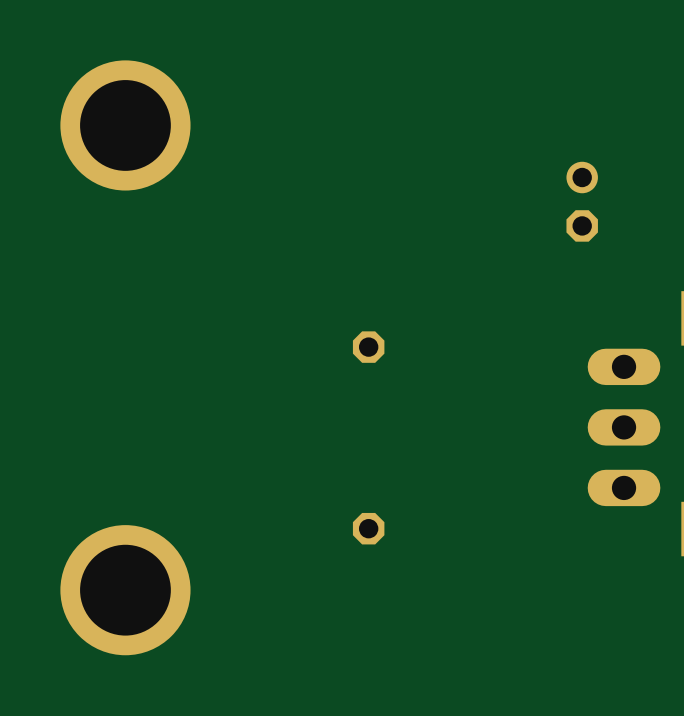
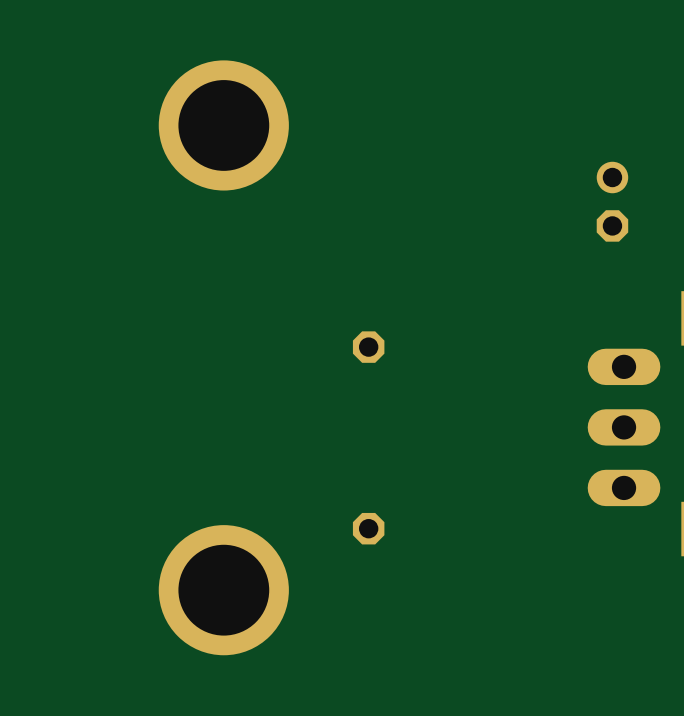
part position: (125, 125) -> (223, 125)
part position: (582, 201) -> (612, 201)
part position: (125, 590) -> (223, 590)

